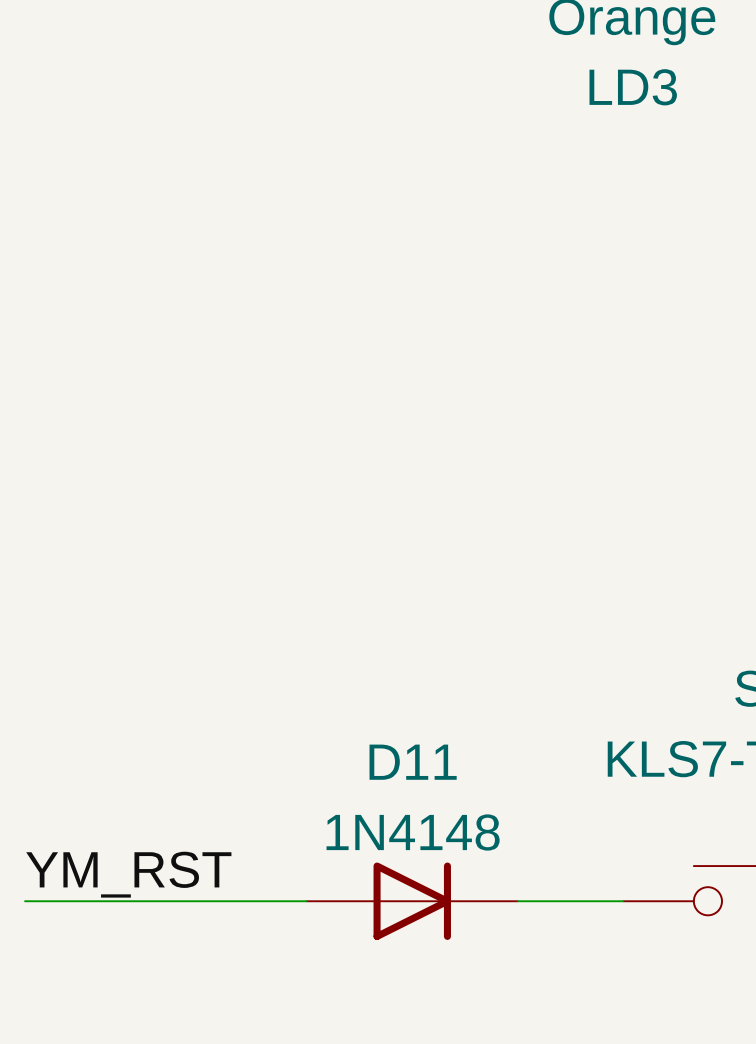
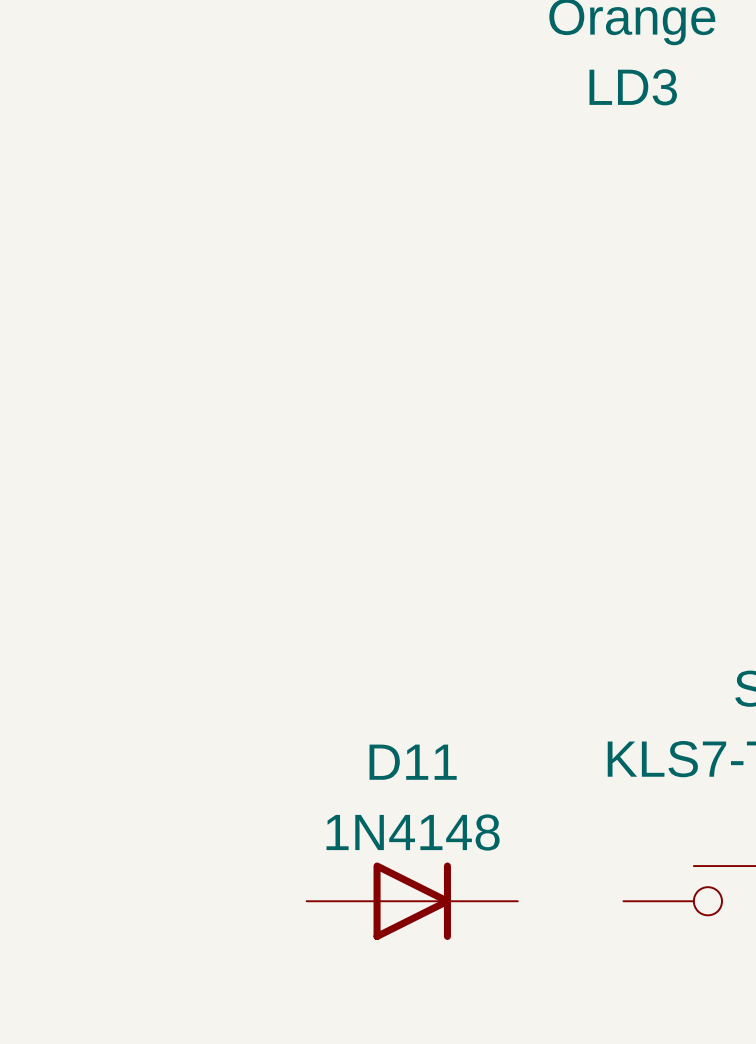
label: YM_RST (128, 874) -> none
wire: (25, 901) (306, 901) -> none
wire: (517, 901) (623, 901) -> none

